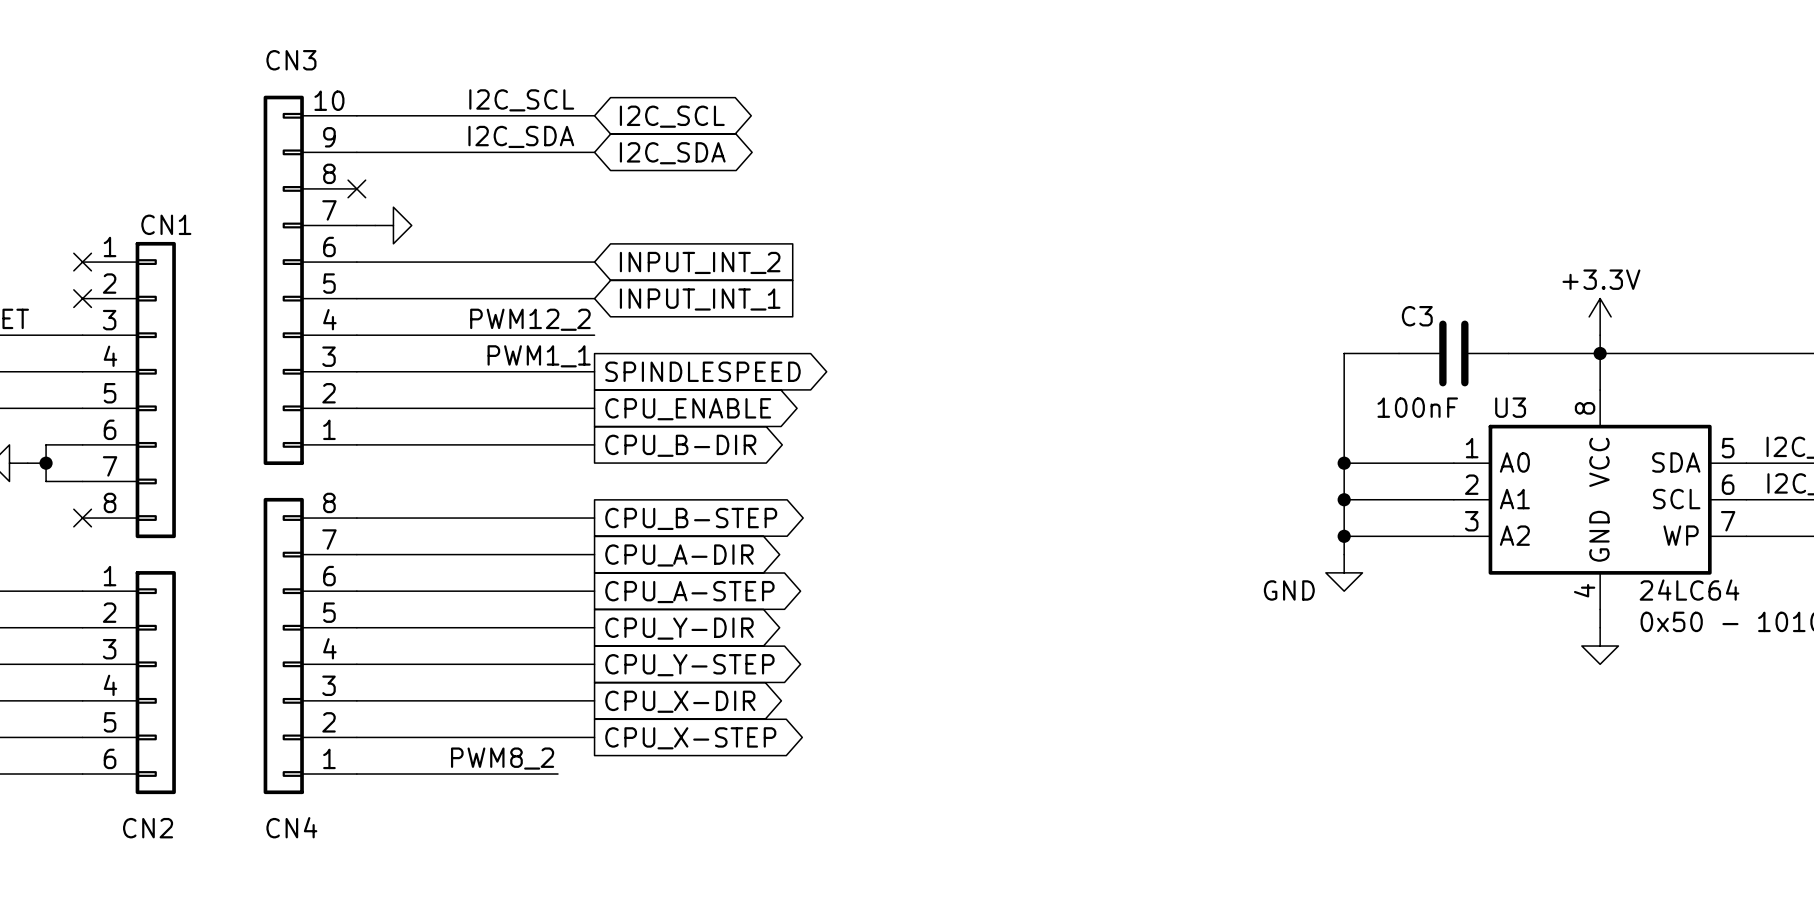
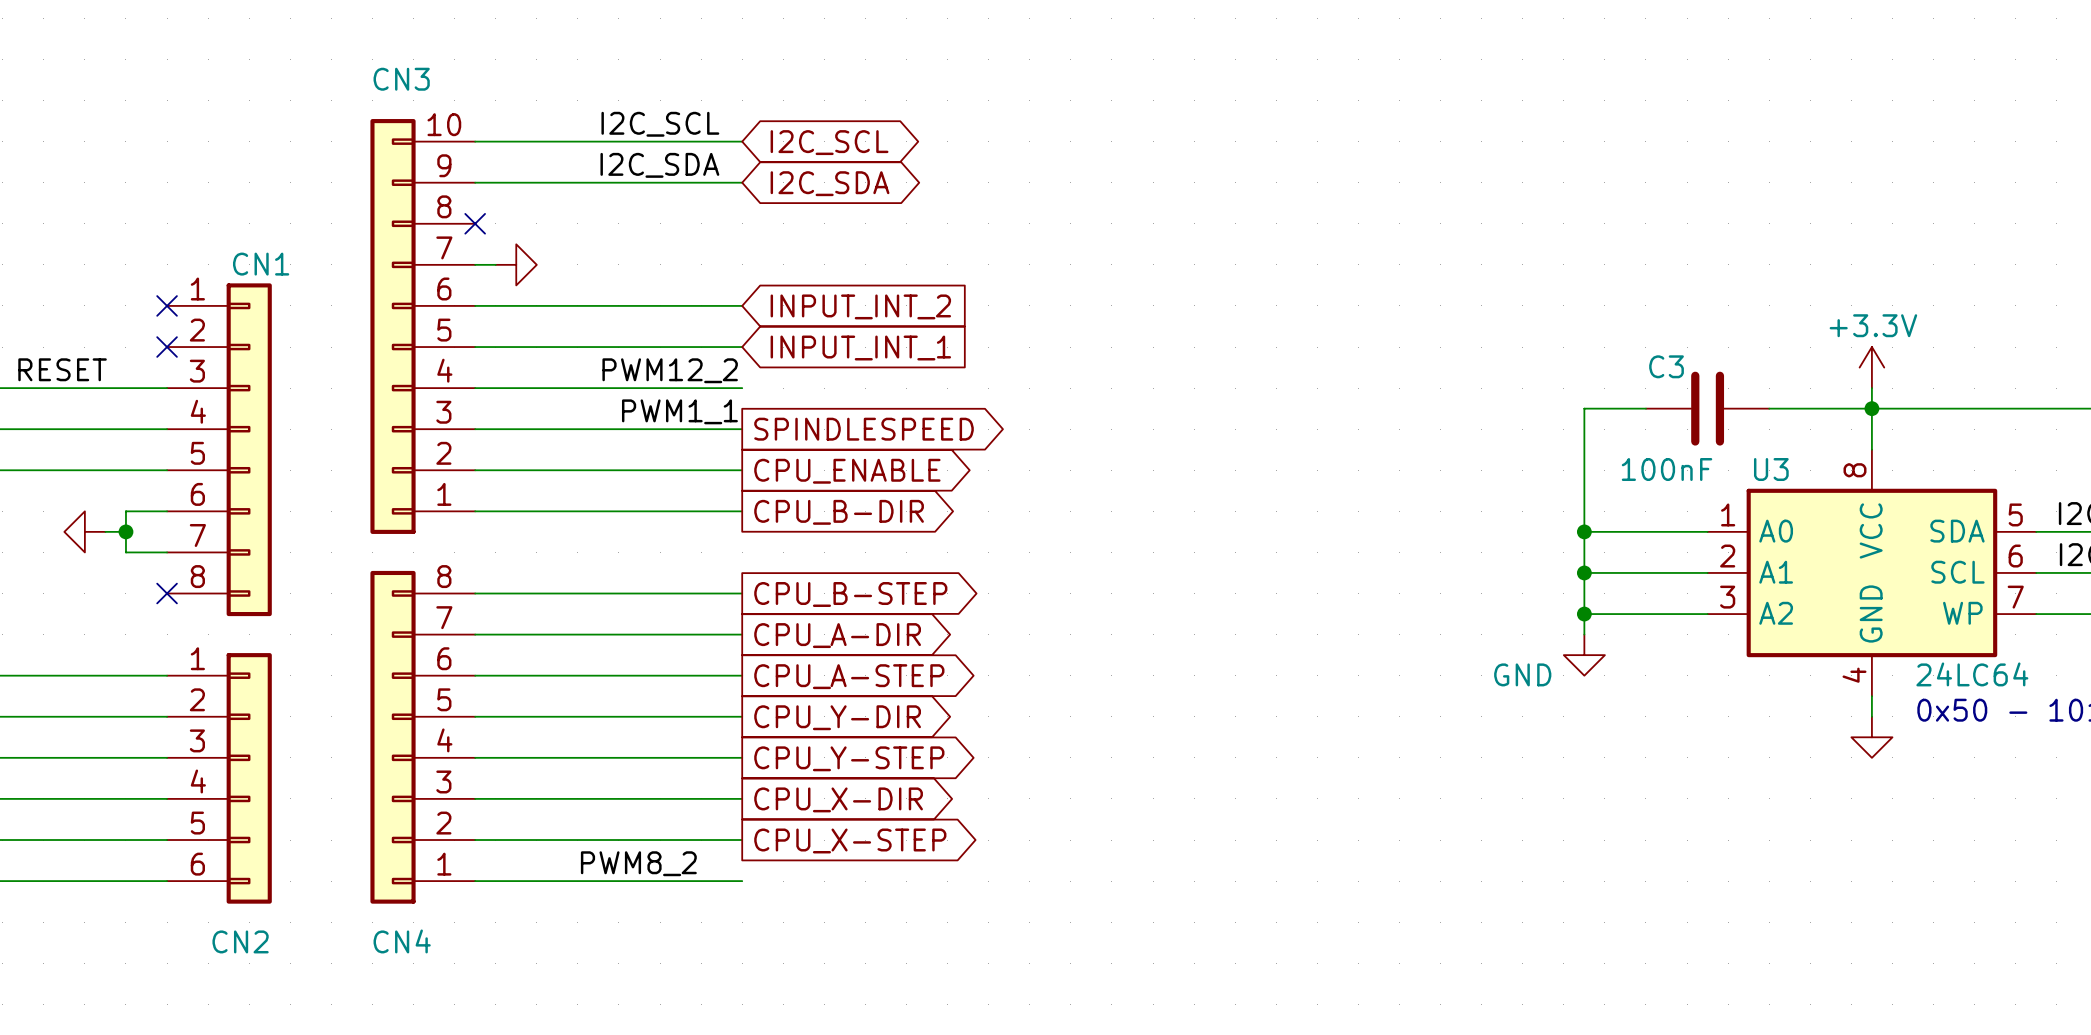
wire: none -> (701, 881) (742, 881)

